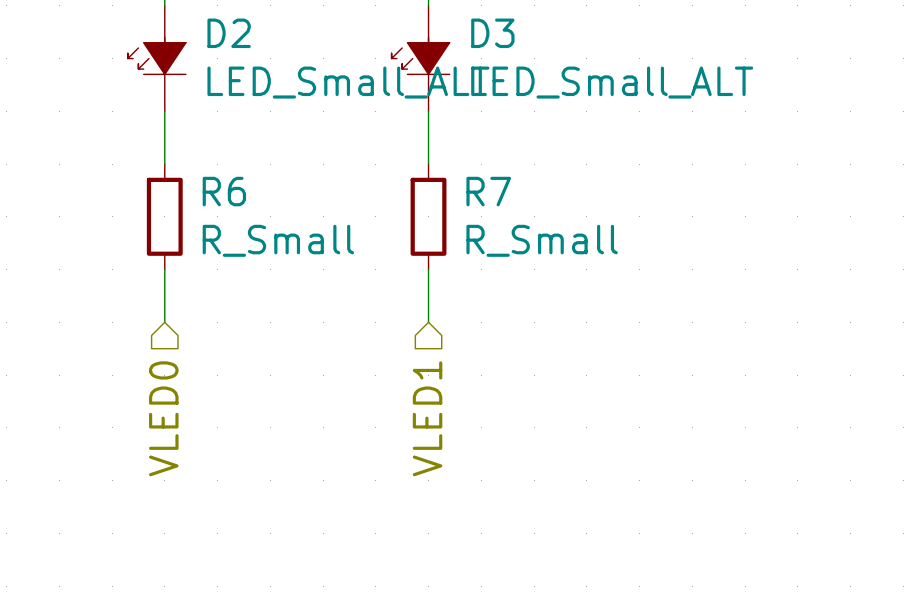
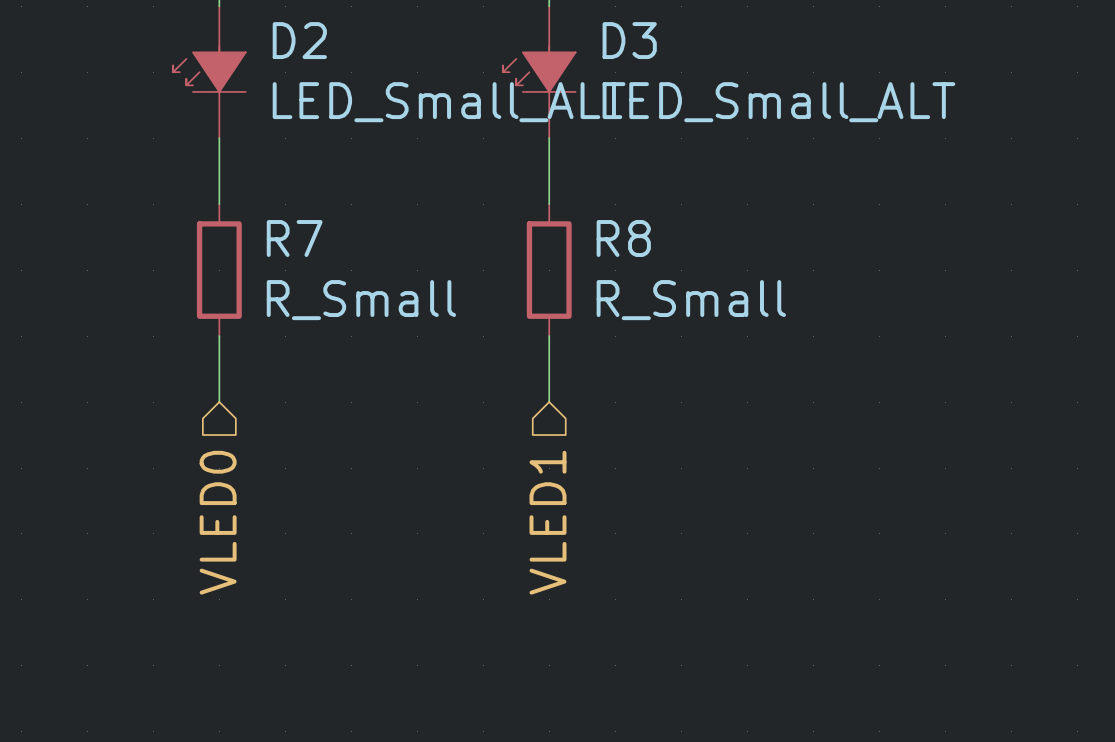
R6 name: R6 (224, 191) -> R7 (294, 238)
R7 name: R7 (488, 191) -> R8 (623, 238)

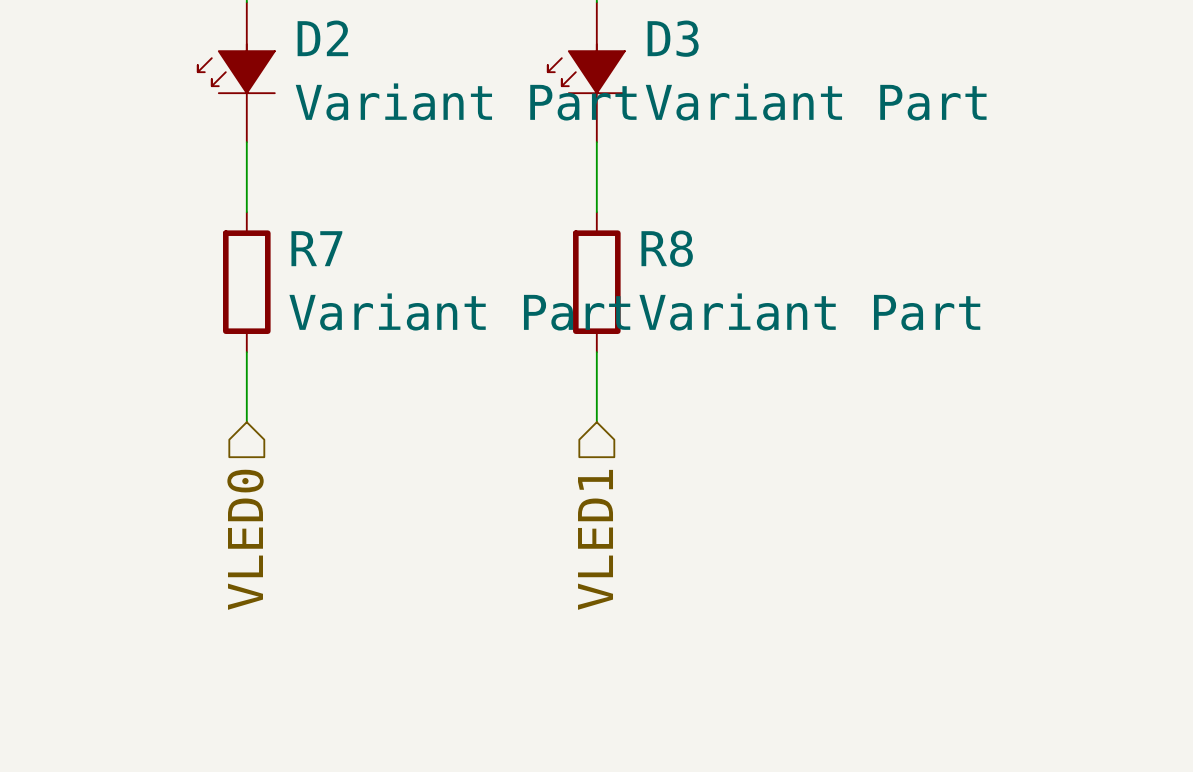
D2 value: LED_Small_ALT (449, 102) -> Variant Part (466, 101)
D3 value: LED_Small_ALT (778, 102) -> Variant Part (816, 101)
R7 value: R_Small (361, 300) -> Variant Part (459, 311)
R8 value: R_Small (691, 300) -> Variant Part (809, 311)

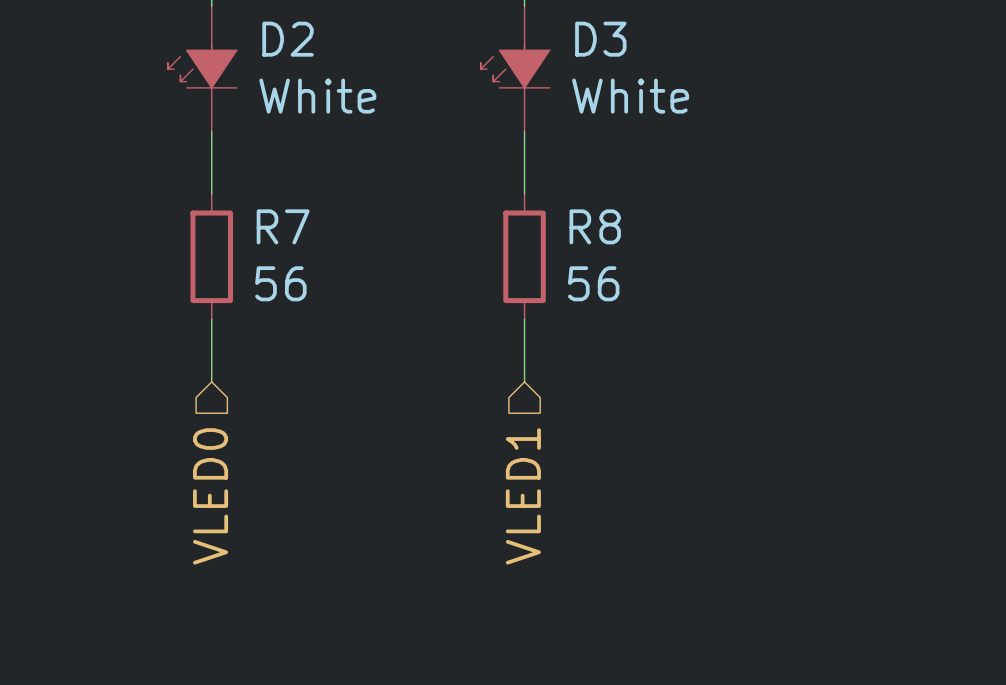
D2 value: Variant Part (466, 101) -> White (317, 96)
D3 value: Variant Part (816, 101) -> White (630, 96)
R7 value: Variant Part (459, 311) -> 56 (280, 283)
R8 value: Variant Part (809, 311) -> 56 (593, 283)

